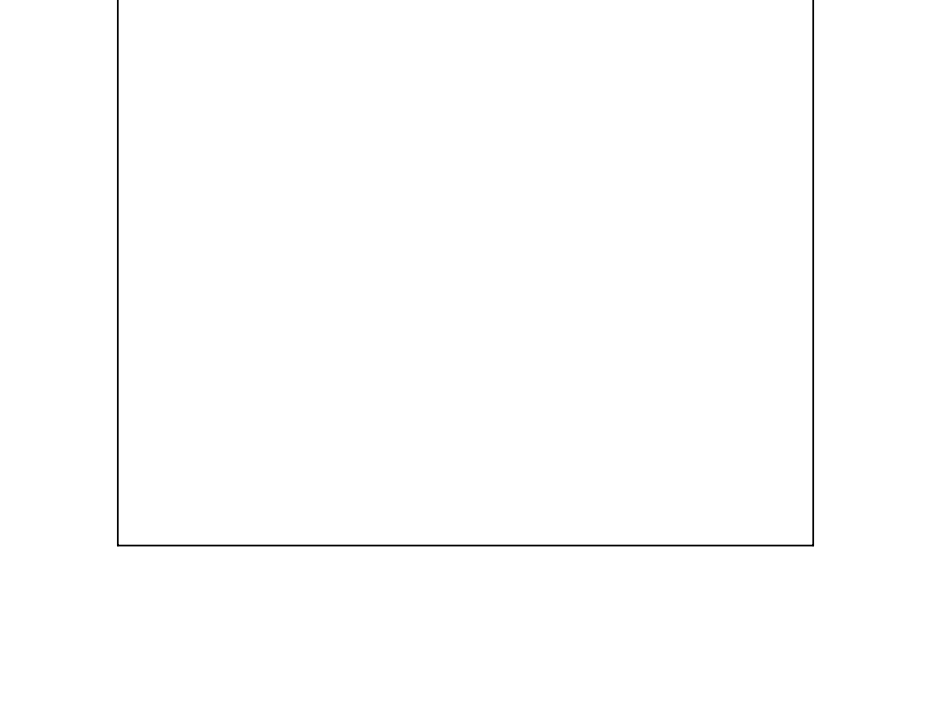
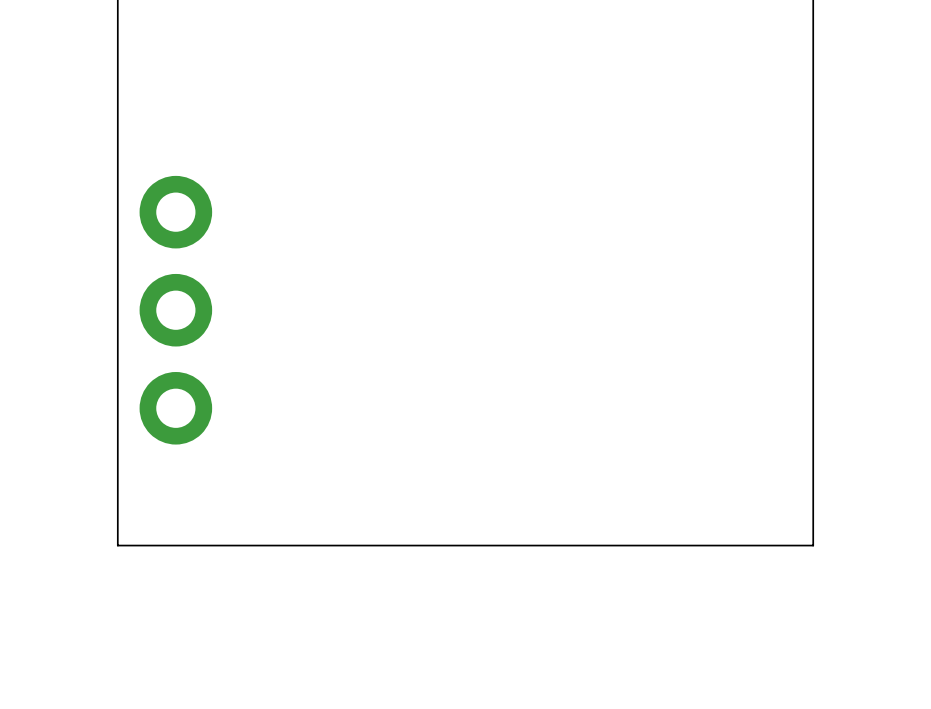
part: none -> (175, 310)

